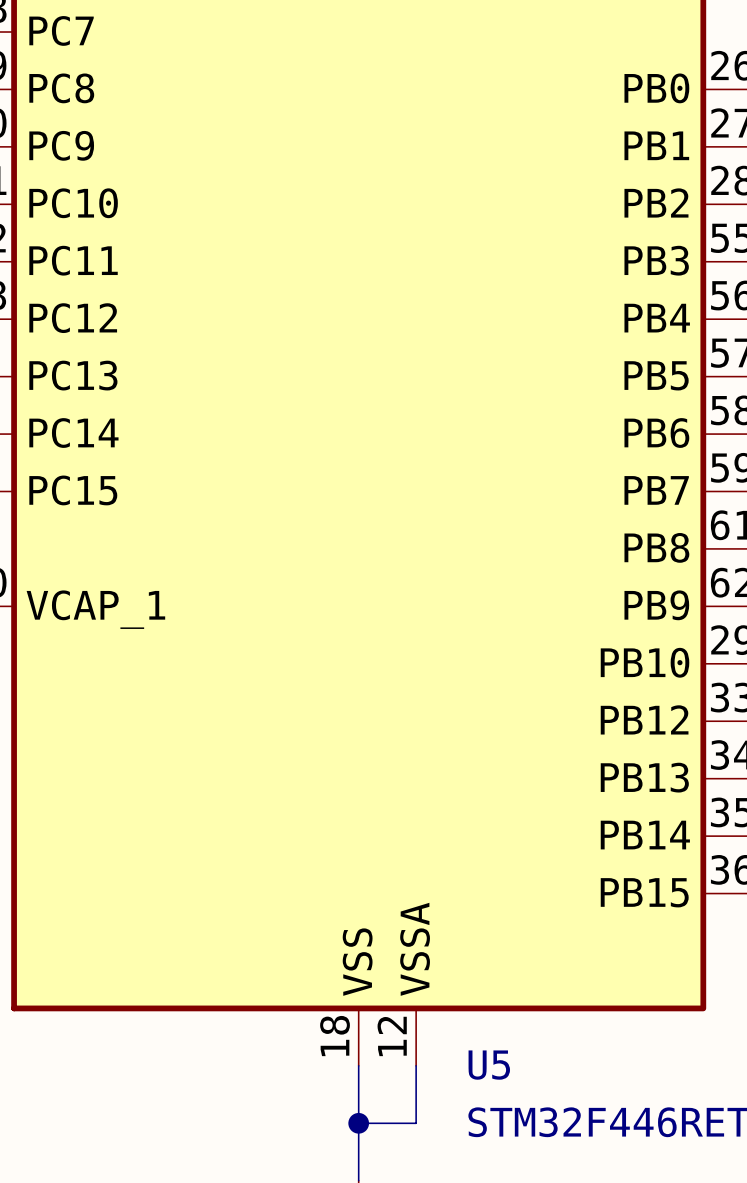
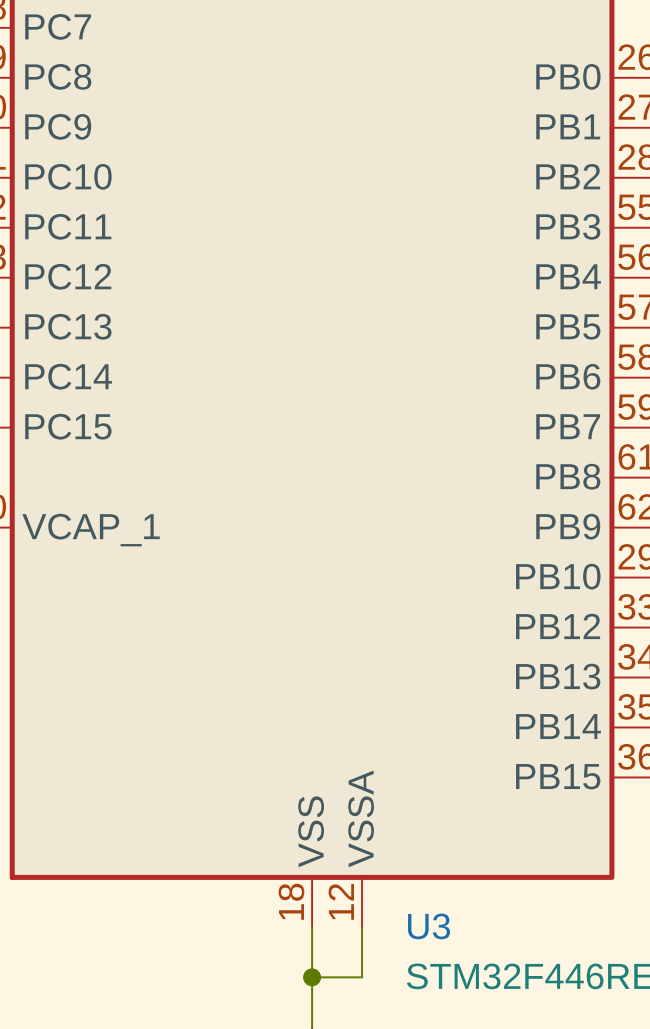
U5 name: U5 (489, 1065) -> U3 (429, 926)

